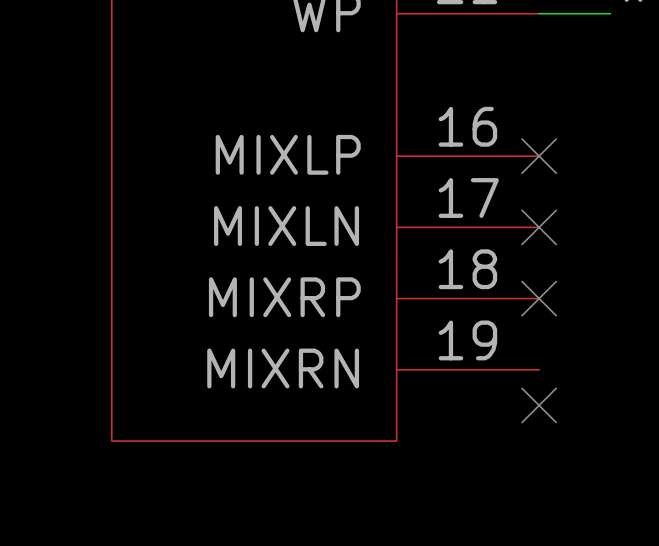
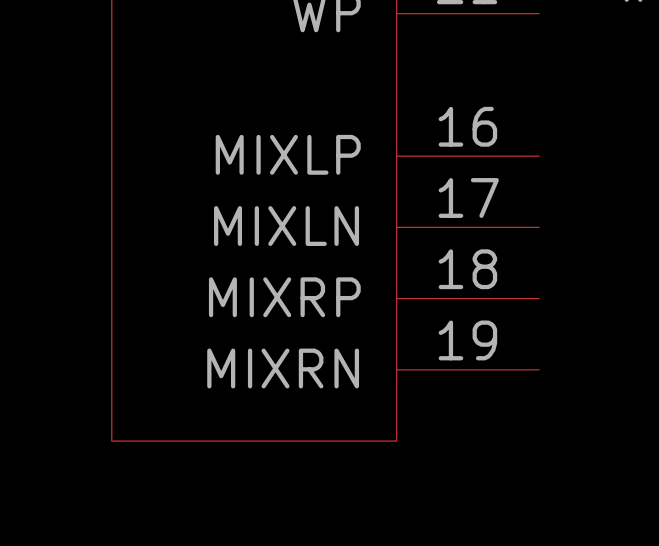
wire: (539, 13) (610, 13) -> none
no-connect mark: (539, 156) -> none
no-connect mark: (539, 227) -> none
no-connect mark: (539, 298) -> none
no-connect mark: (539, 405) -> none

